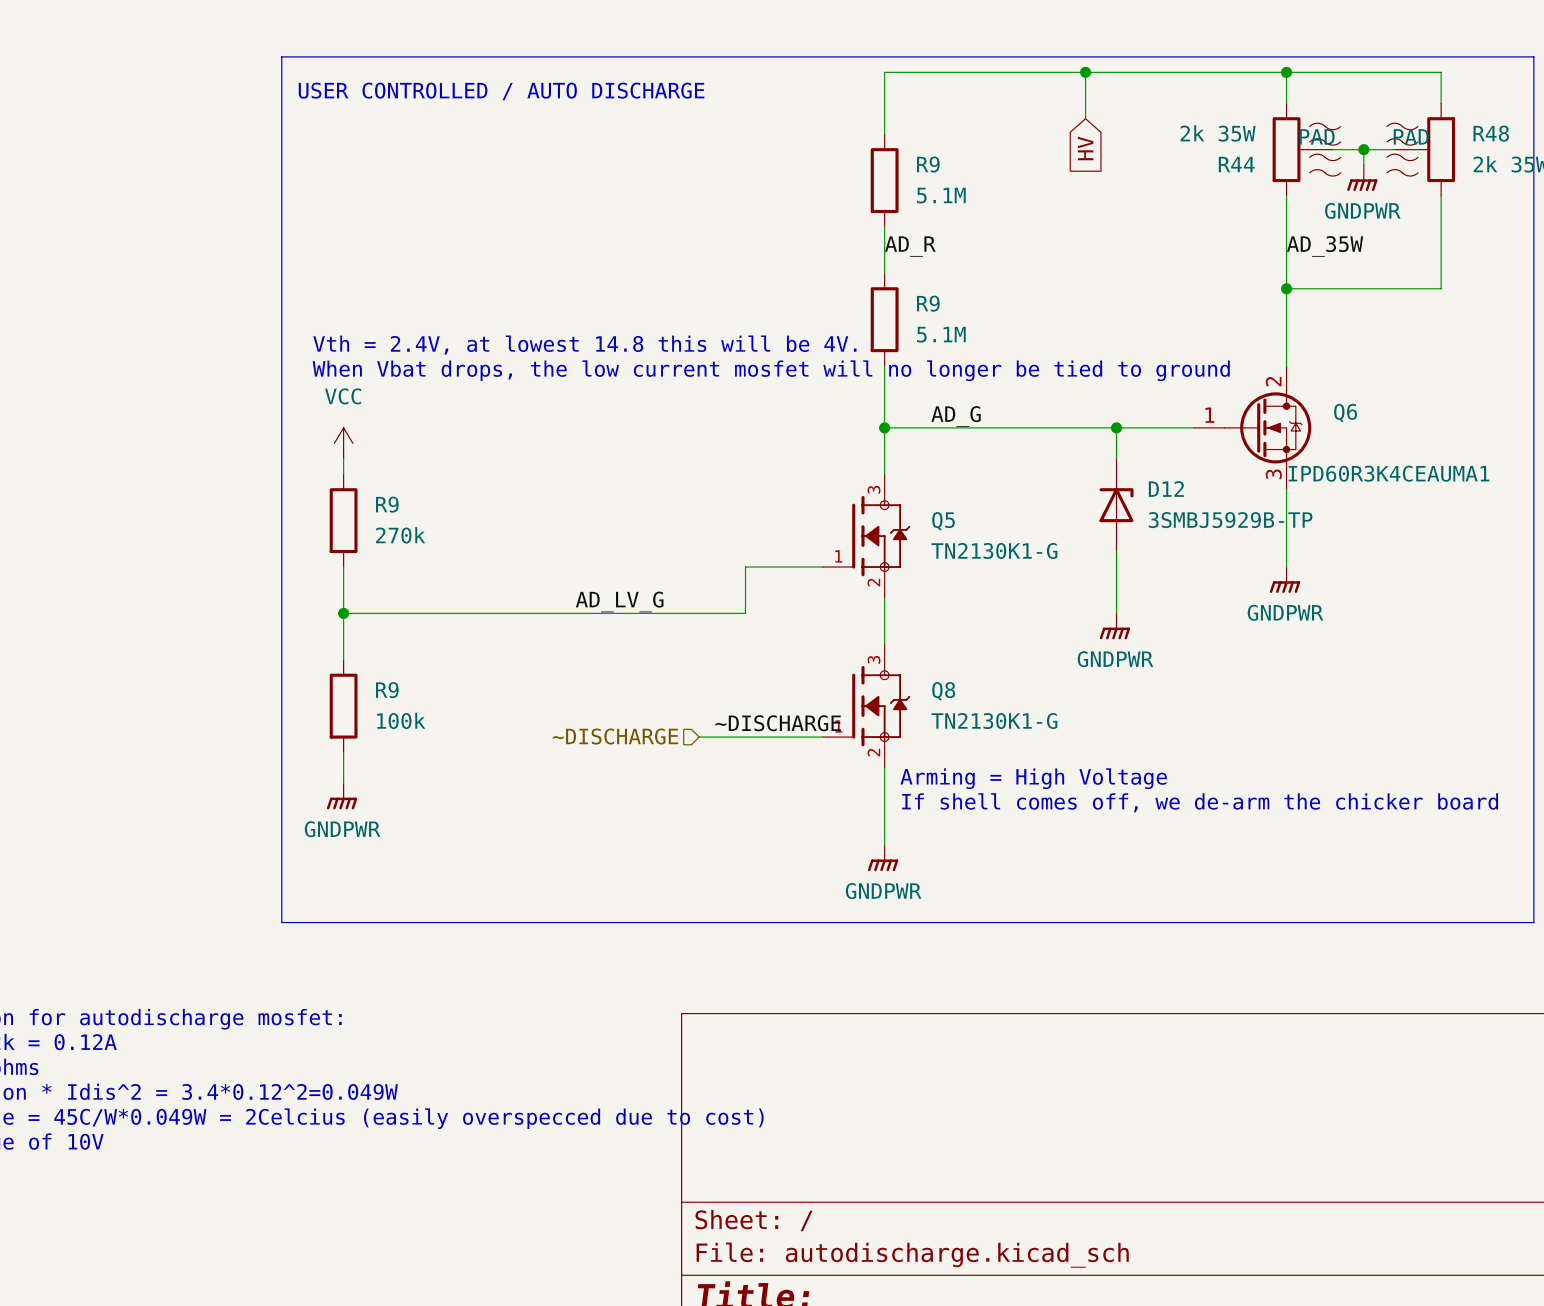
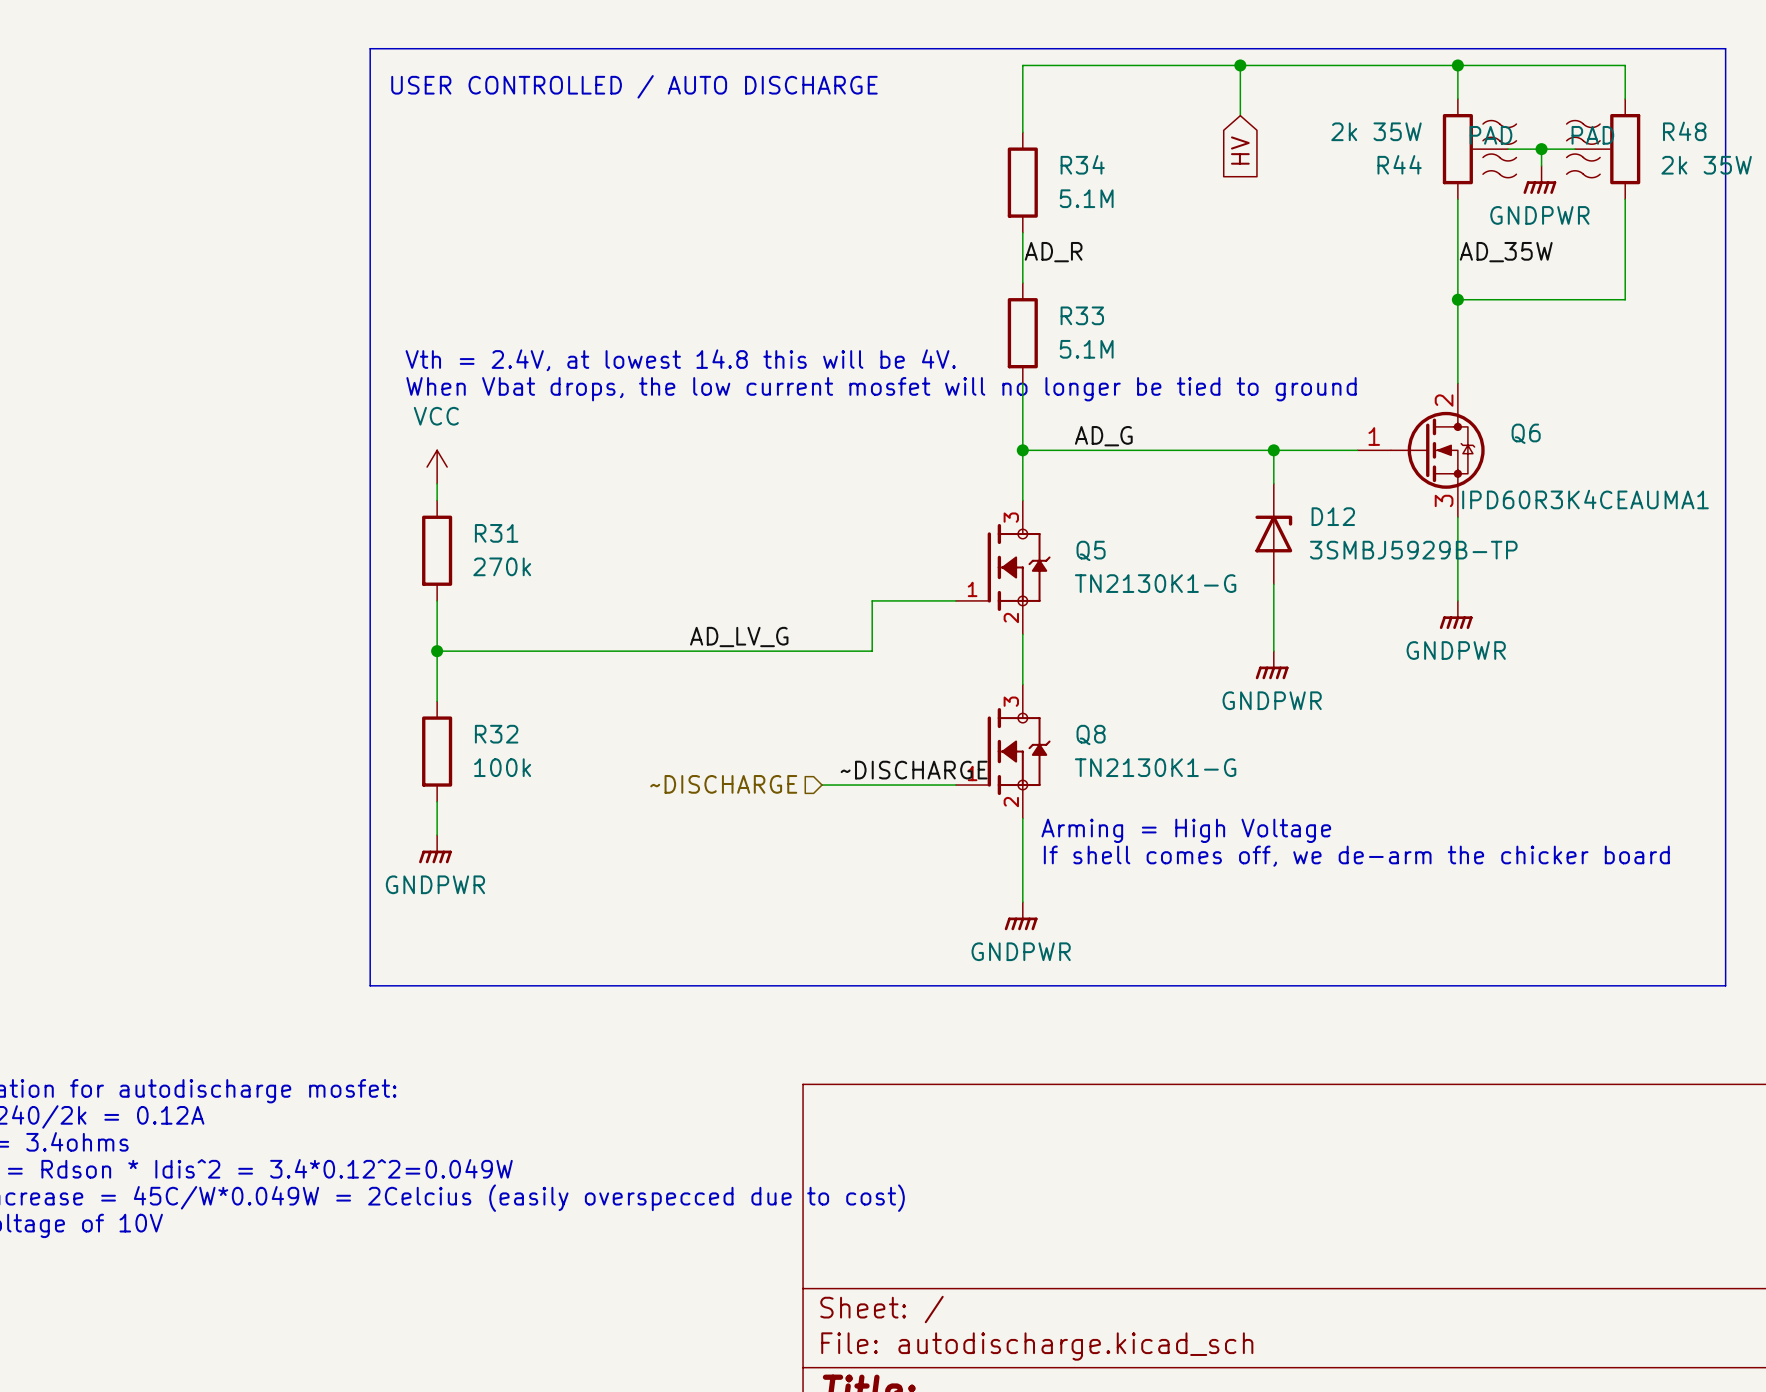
R9 name: R9 (928, 164) -> R34 (1082, 164)
R9 name: R9 (928, 303) -> R33 (1082, 315)
R9 name: R9 (387, 504) -> R31 (496, 533)
R9 name: R9 (387, 690) -> R32 (496, 734)

